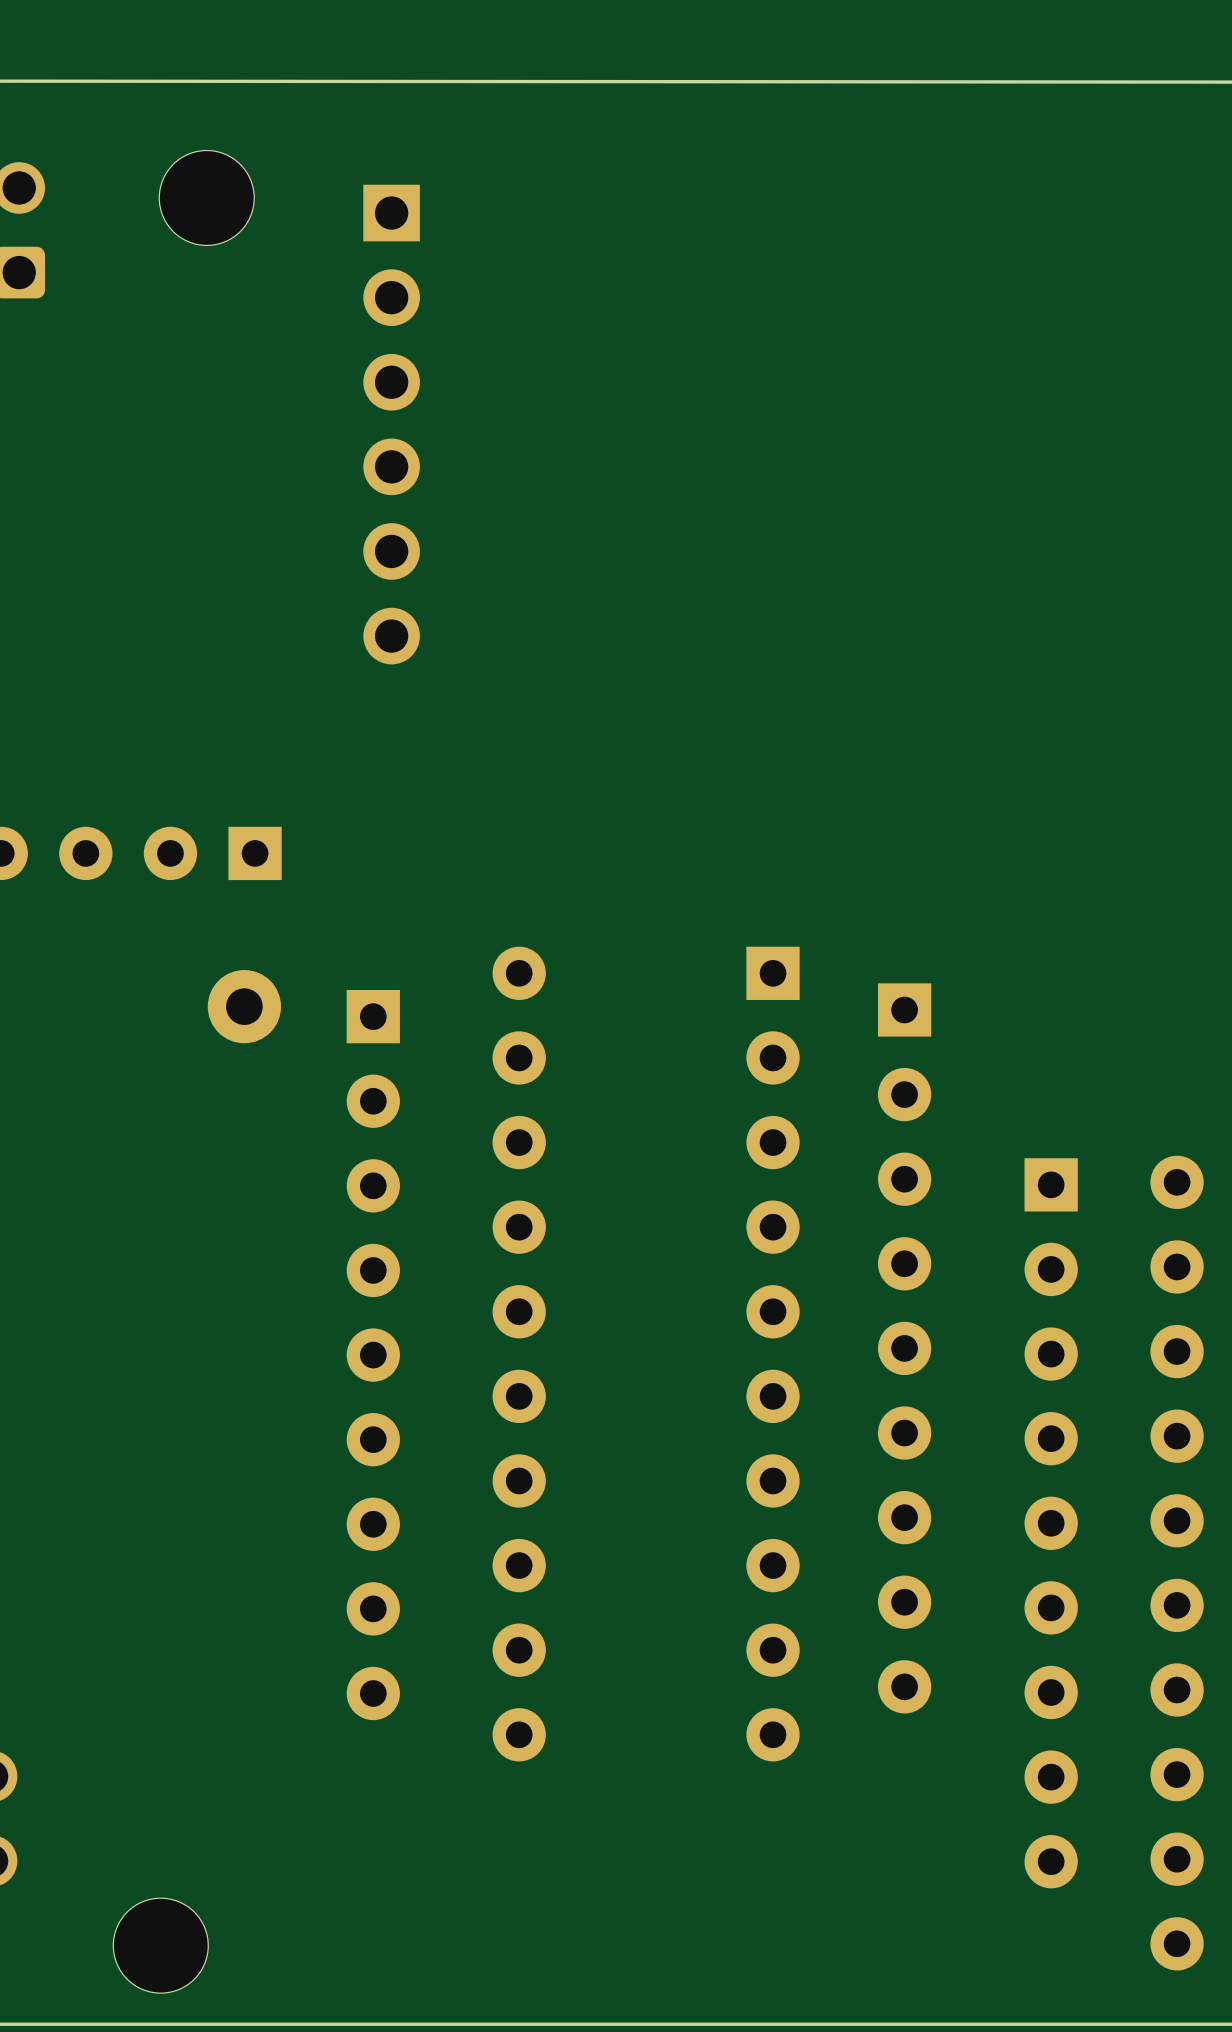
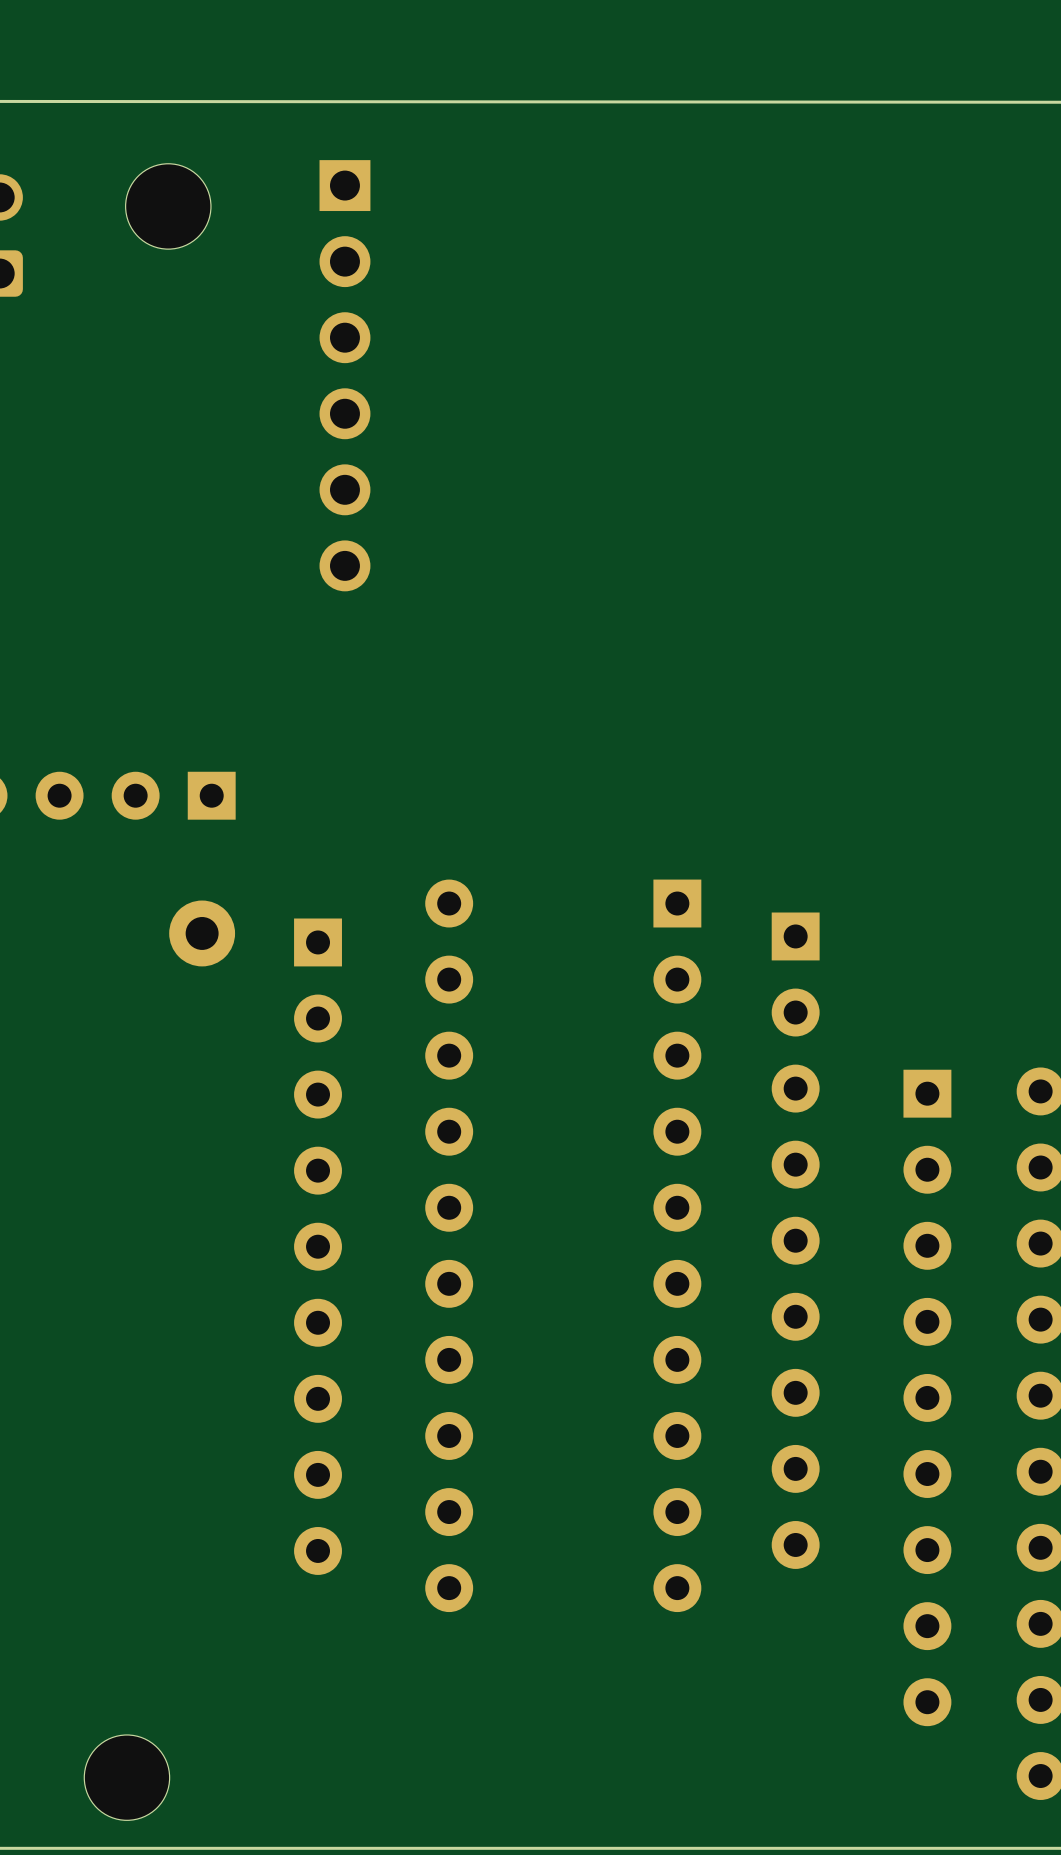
part position: (391, 424) -> (344, 375)

